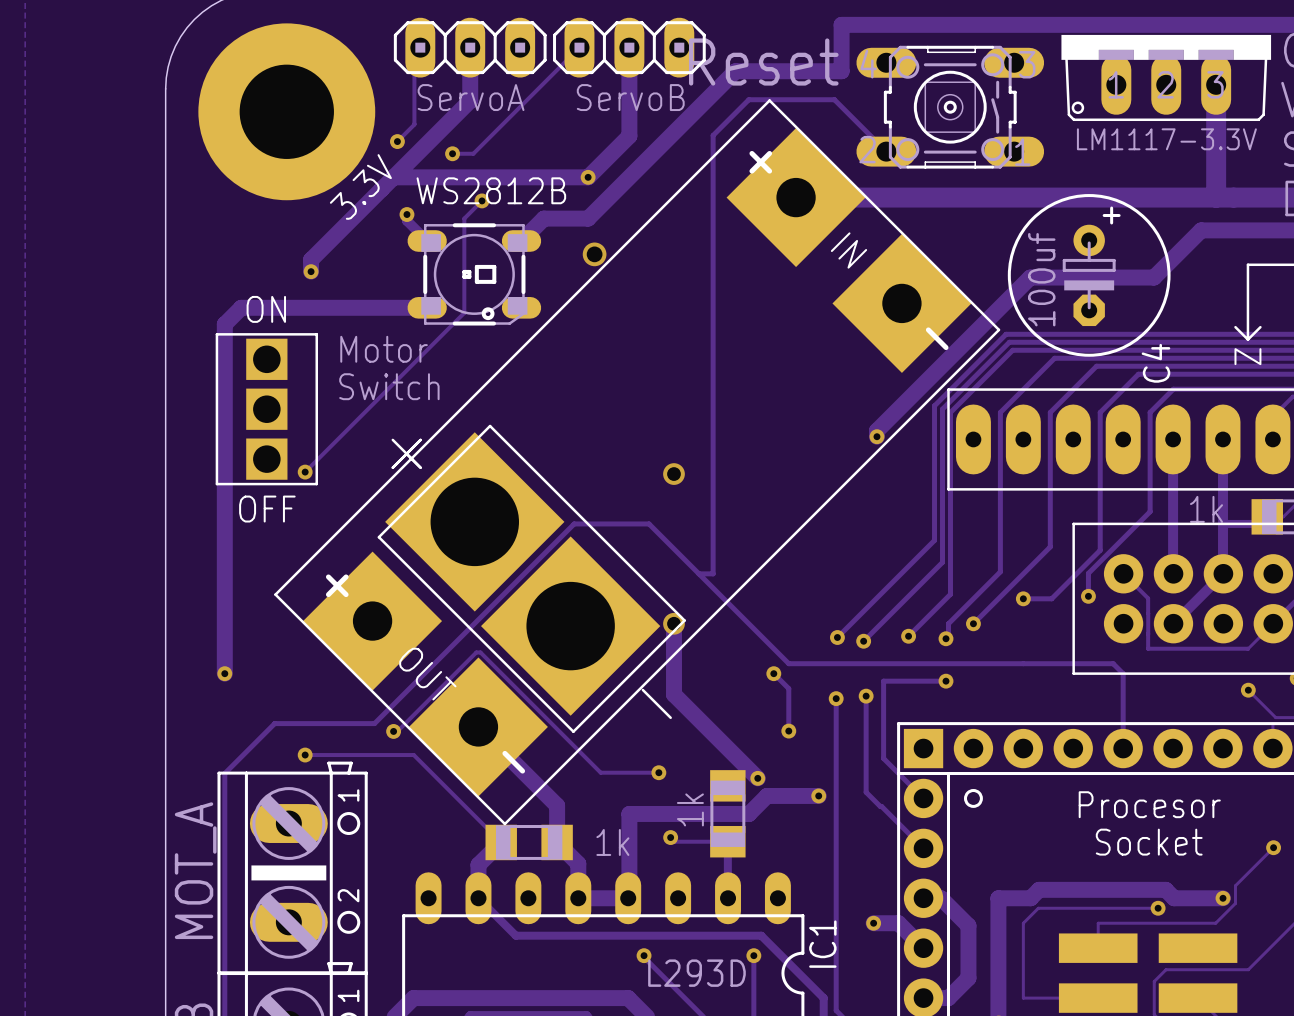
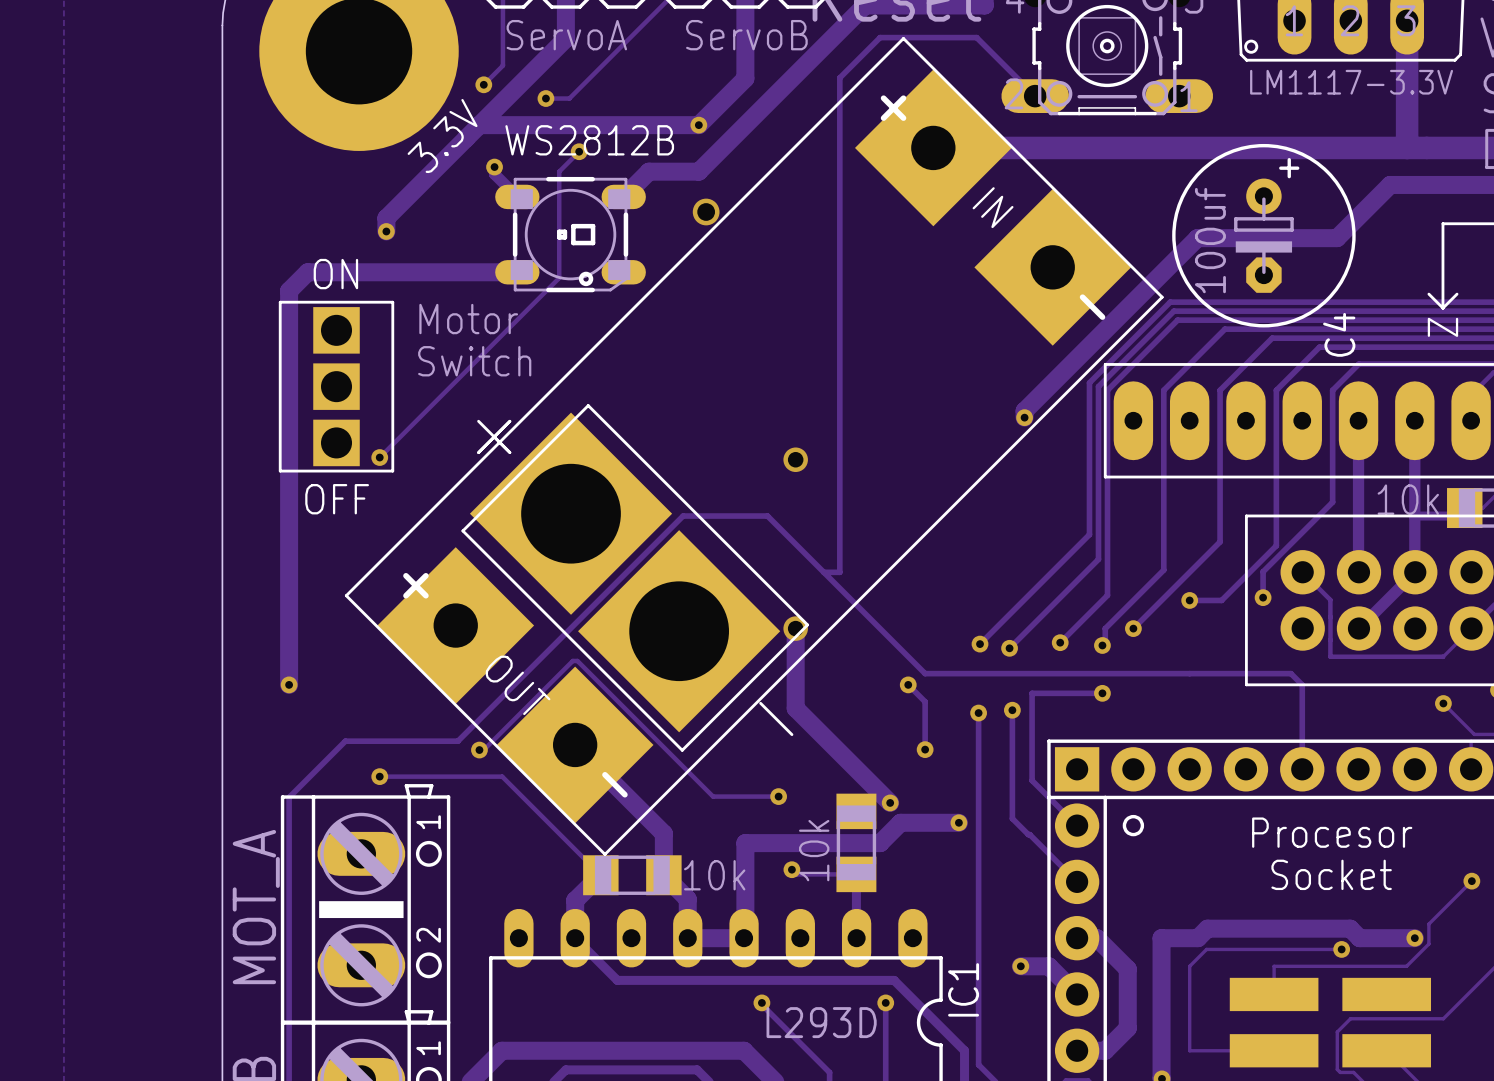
part value: 1k (1206, 509) -> 10k (1408, 499)
part value: 1k (690, 809) -> 10k (814, 850)
part value: 1k (612, 842) -> 10k (714, 875)

